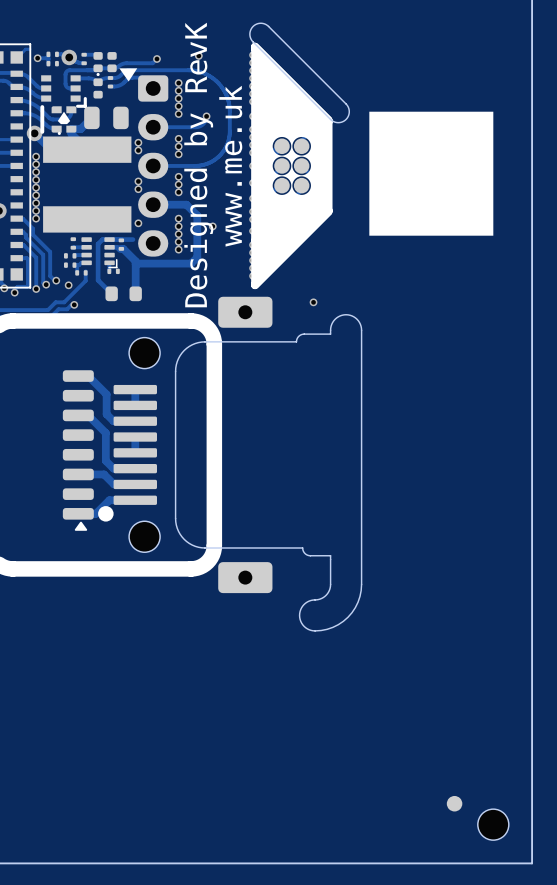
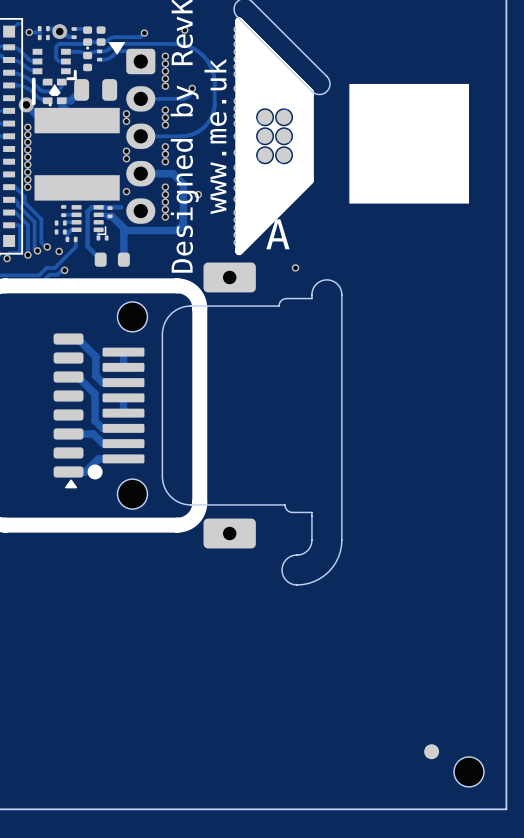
text: none -> A (277, 234)

